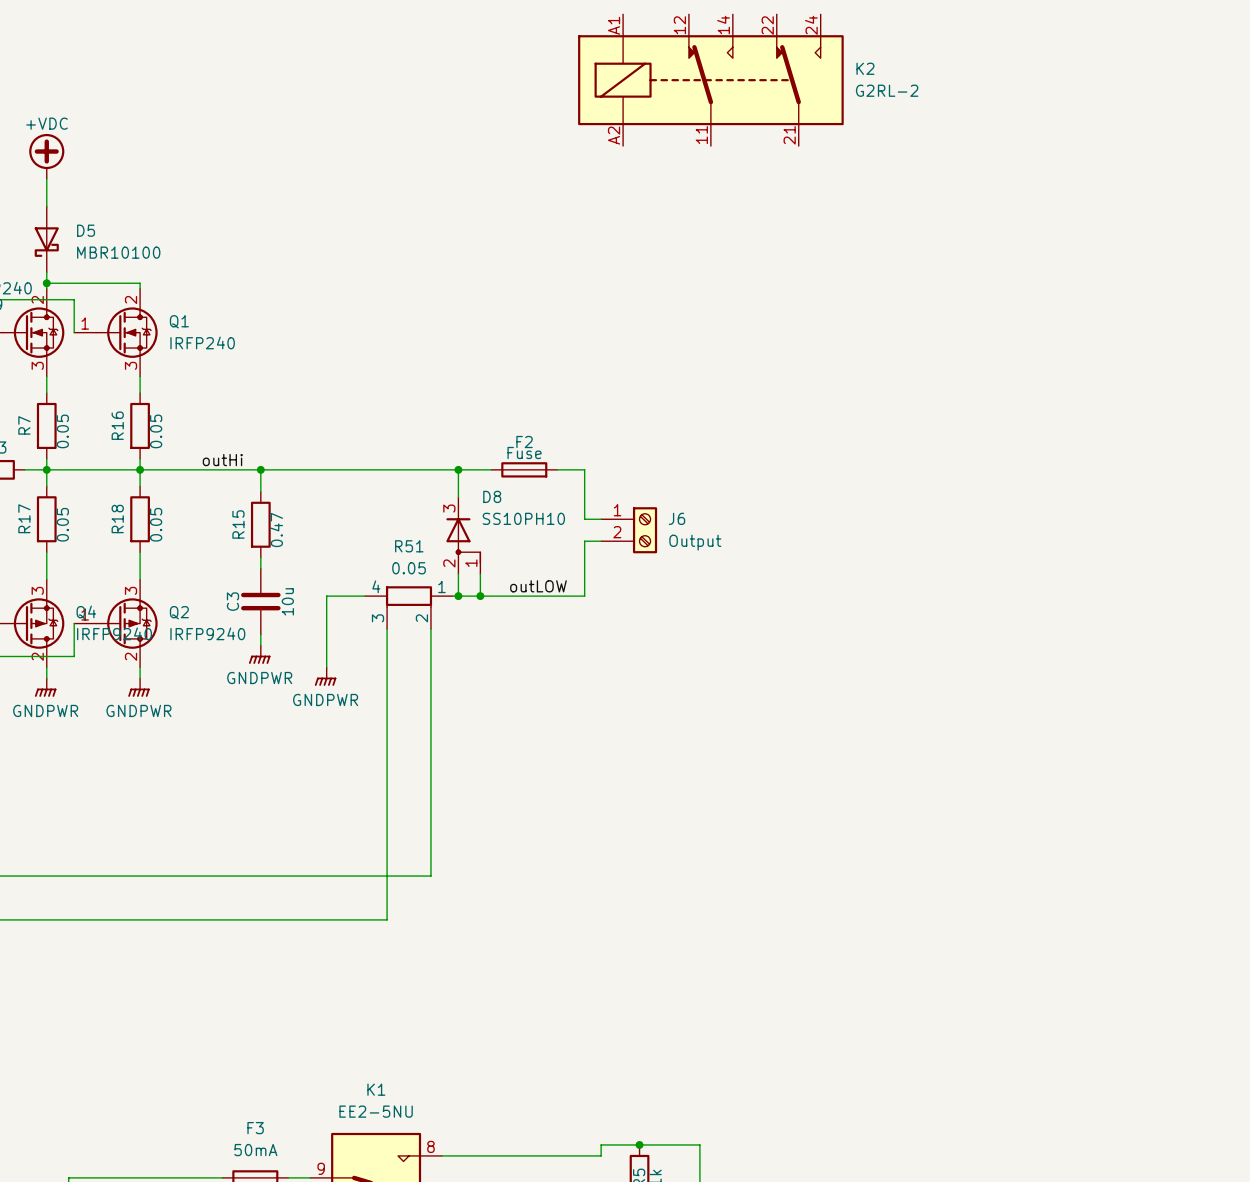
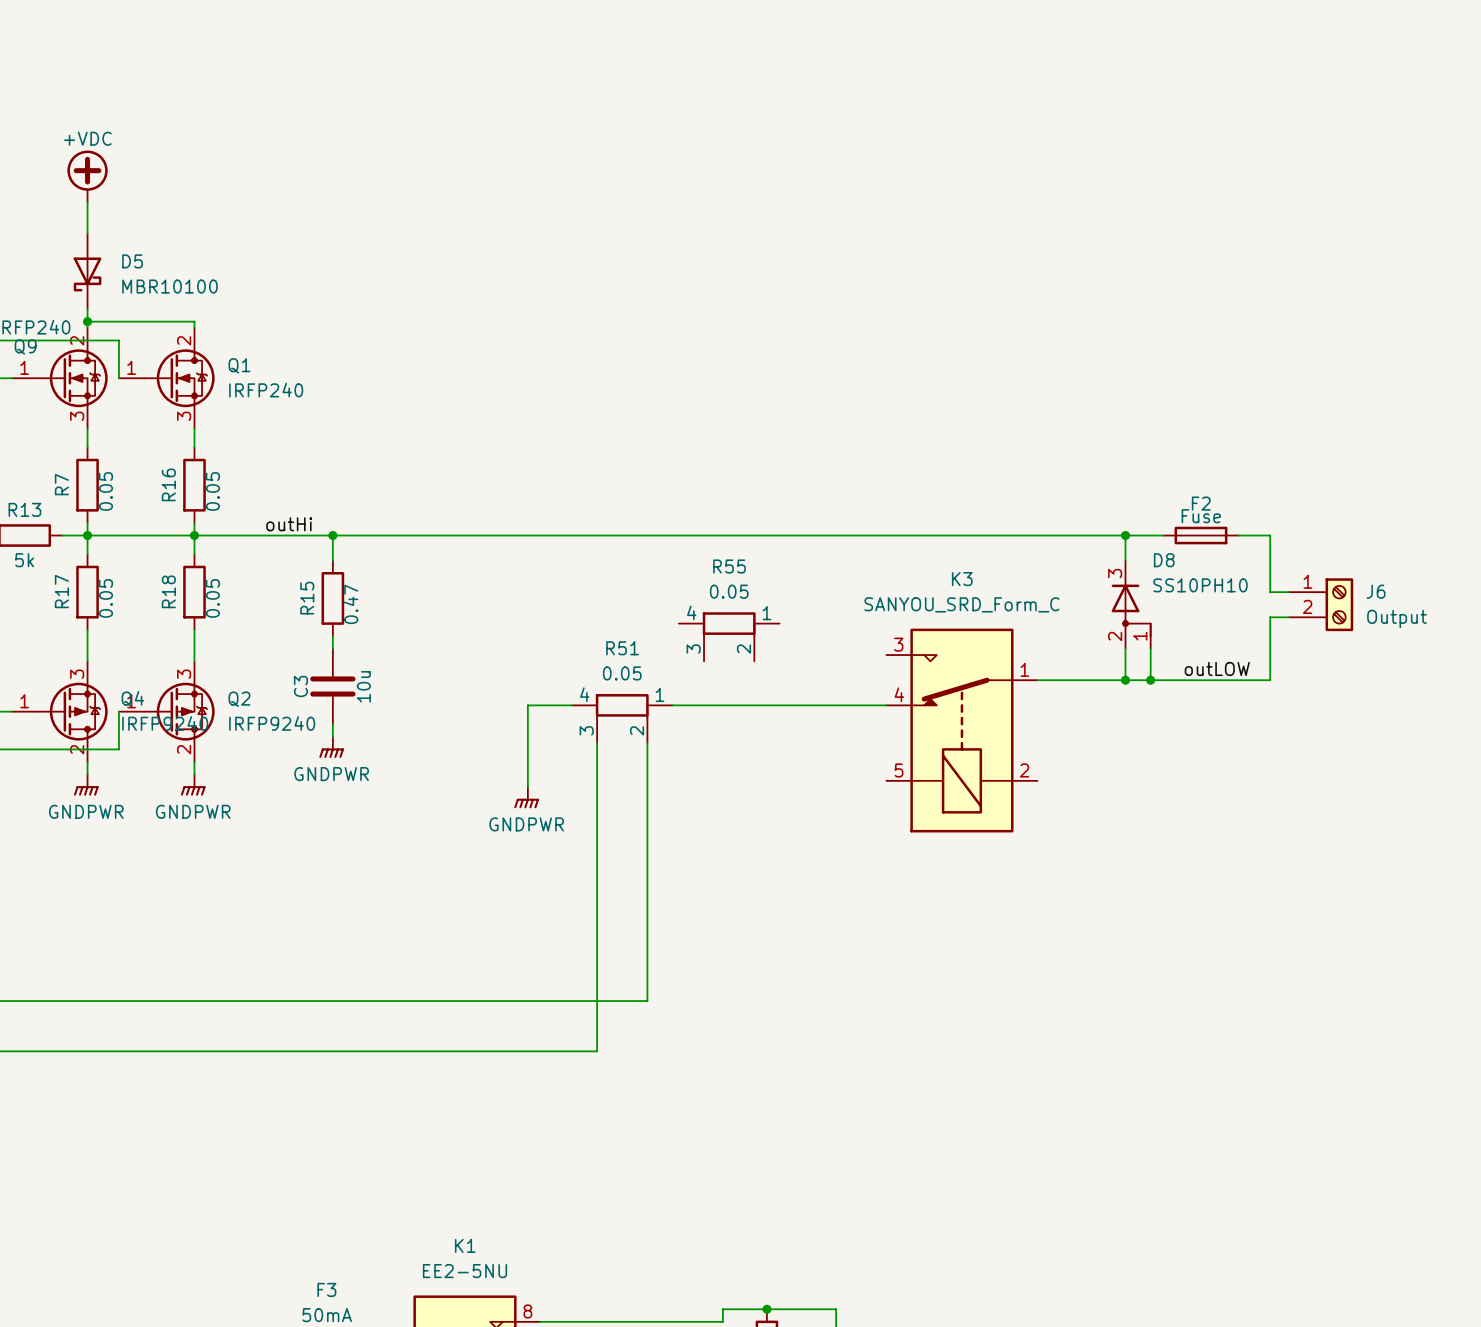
K2: G2RL-2 (710, 80) -> none
wire: (458, 469) (458, 497) -> none
junction: (458, 469) -> none
F2 position: (524, 469) -> (1200, 535)
wire: (584, 469) (584, 519) (601, 519) -> (704, 535) (1163, 535)
wire: none -> (1125, 535) (1125, 560)
junction: none -> (1125, 535)
wire: none -> (1238, 535) (1270, 535) (1270, 592) (1289, 592)
J6 position: (629, 530) -> (1321, 604)
D8 position: (463, 535) -> (1131, 604)
wire: (601, 541) (584, 541) (584, 596) (452, 596) -> none
wire: none -> (1289, 617) (1270, 617) (1270, 680) (1037, 680)
R55: none -> 0.05 (729, 636)
wire: none -> (1125, 648) (1125, 680)
wire: none -> (1150, 648) (1150, 680)
wire: (458, 574) (458, 596) -> none
wire: (480, 574) (480, 596) -> none
label: outLOW (538, 586) -> none
label: none -> outLOW (1217, 668)
wire: (365, 596) (326, 596) (326, 667) -> none
junction: (458, 596) -> none
junction: (480, 596) -> none
junction: none -> (1125, 680)
junction: none -> (1150, 680)
R51 position: (409, 607) -> (622, 718)
wire: none -> (571, 705) (527, 705) (527, 717)
wire: none -> (672, 705) (886, 705)
wire: (387, 629) (387, 919) -> (597, 743) (597, 1051) (477, 1051)
K3: none -> SANYOU_SRD_Form_C (961, 730)
power symbol position: GNDPWR (325, 676) -> GNDPWR (526, 797)
wire: (430, 689) (430, 876) -> (647, 743) (647, 1001) (527, 1001)

